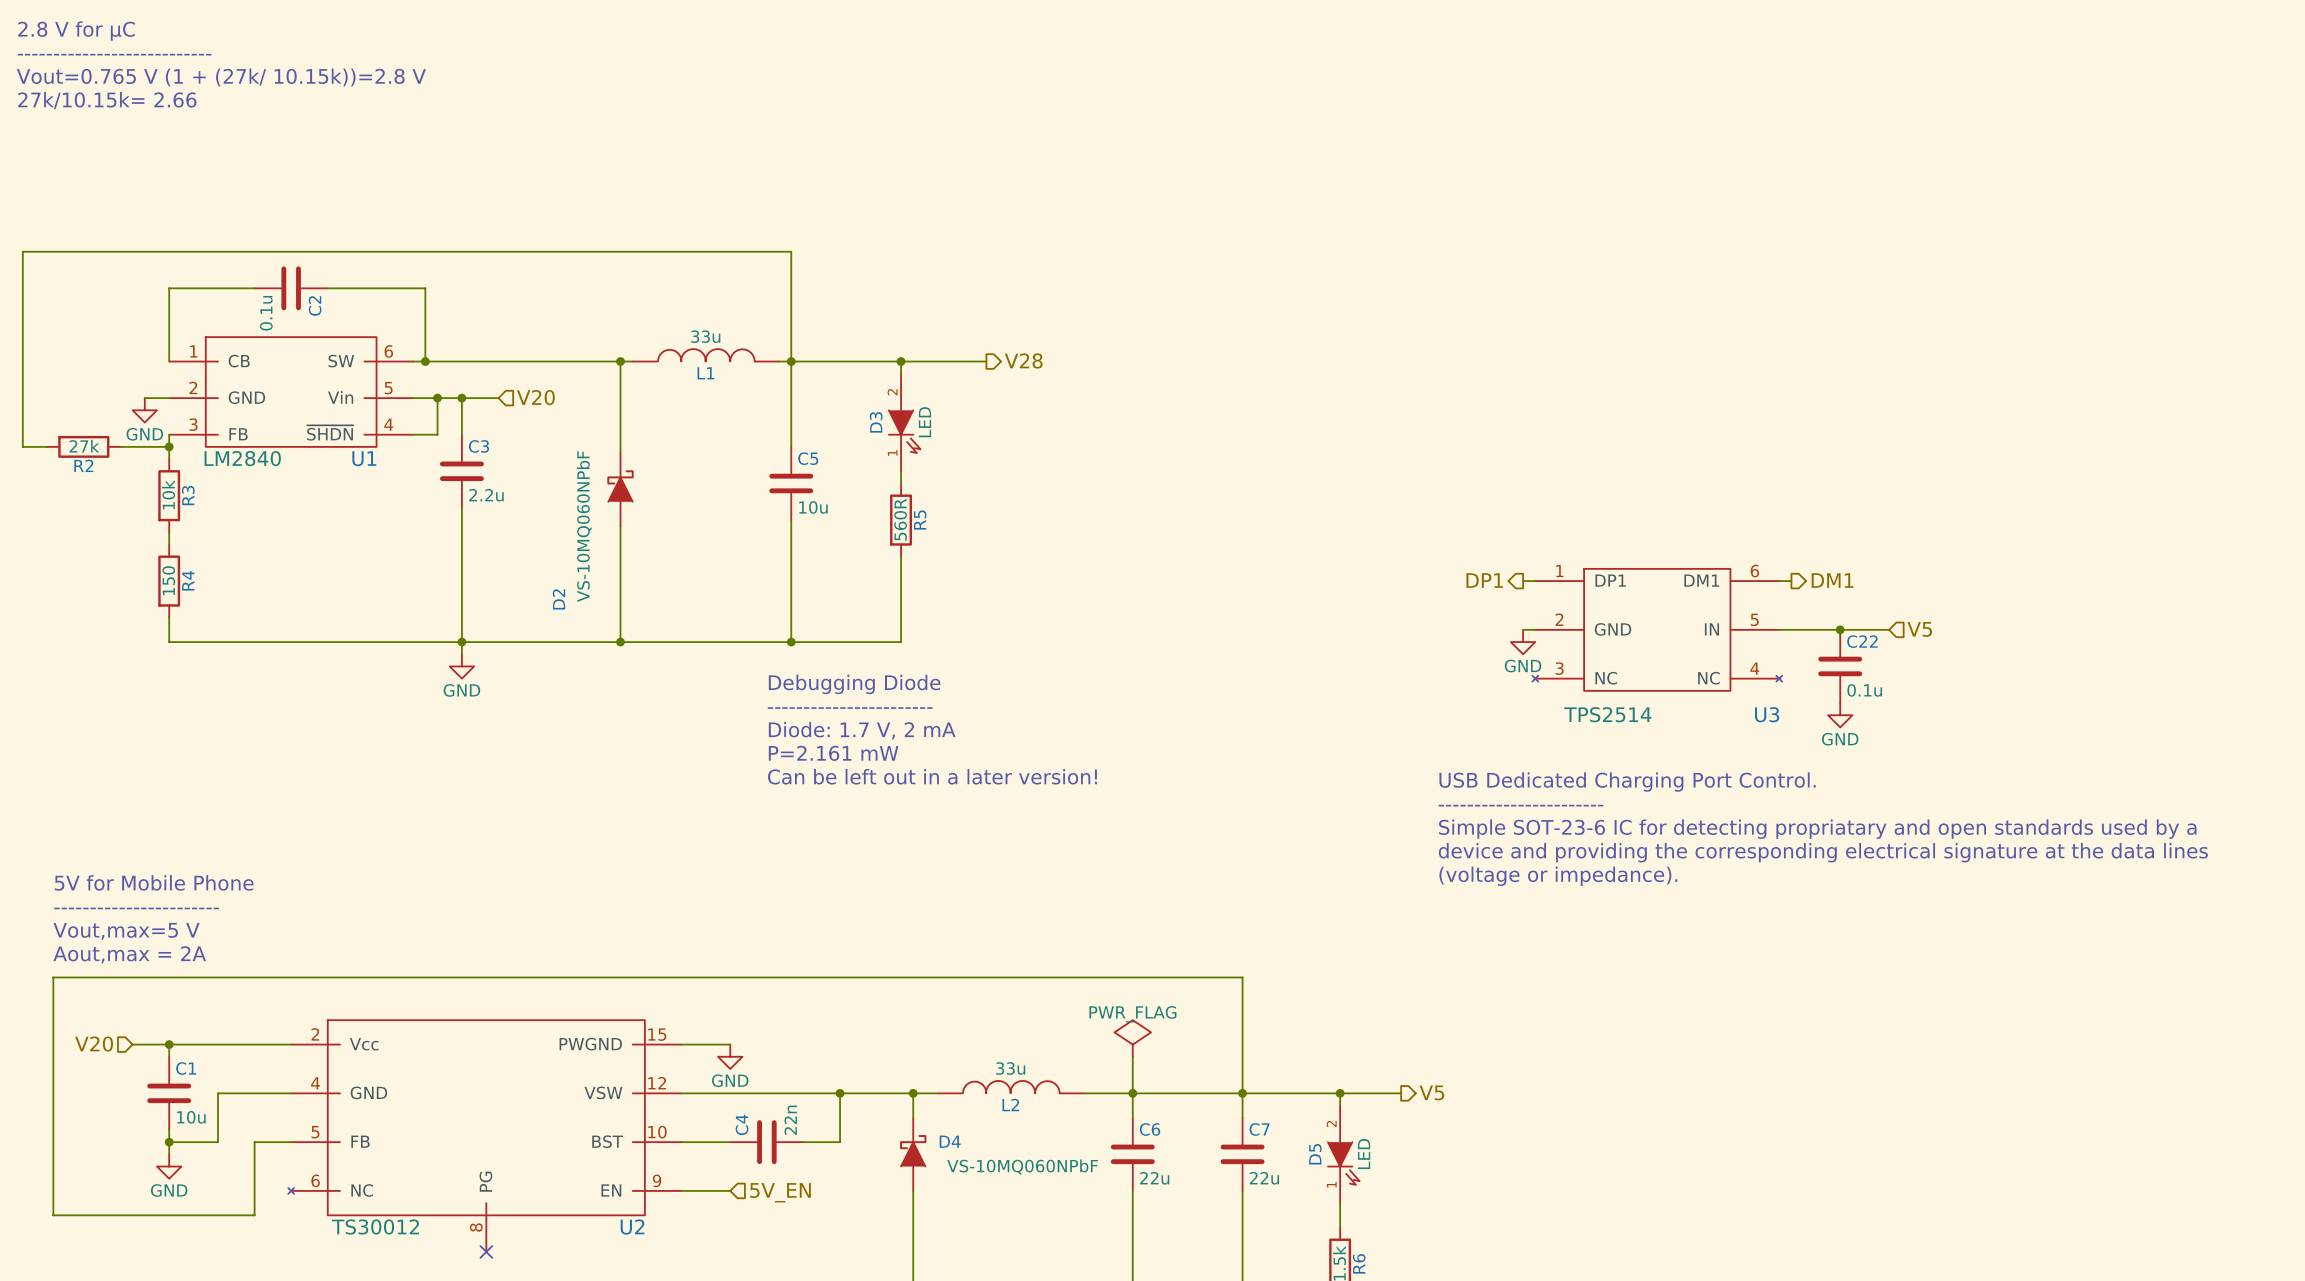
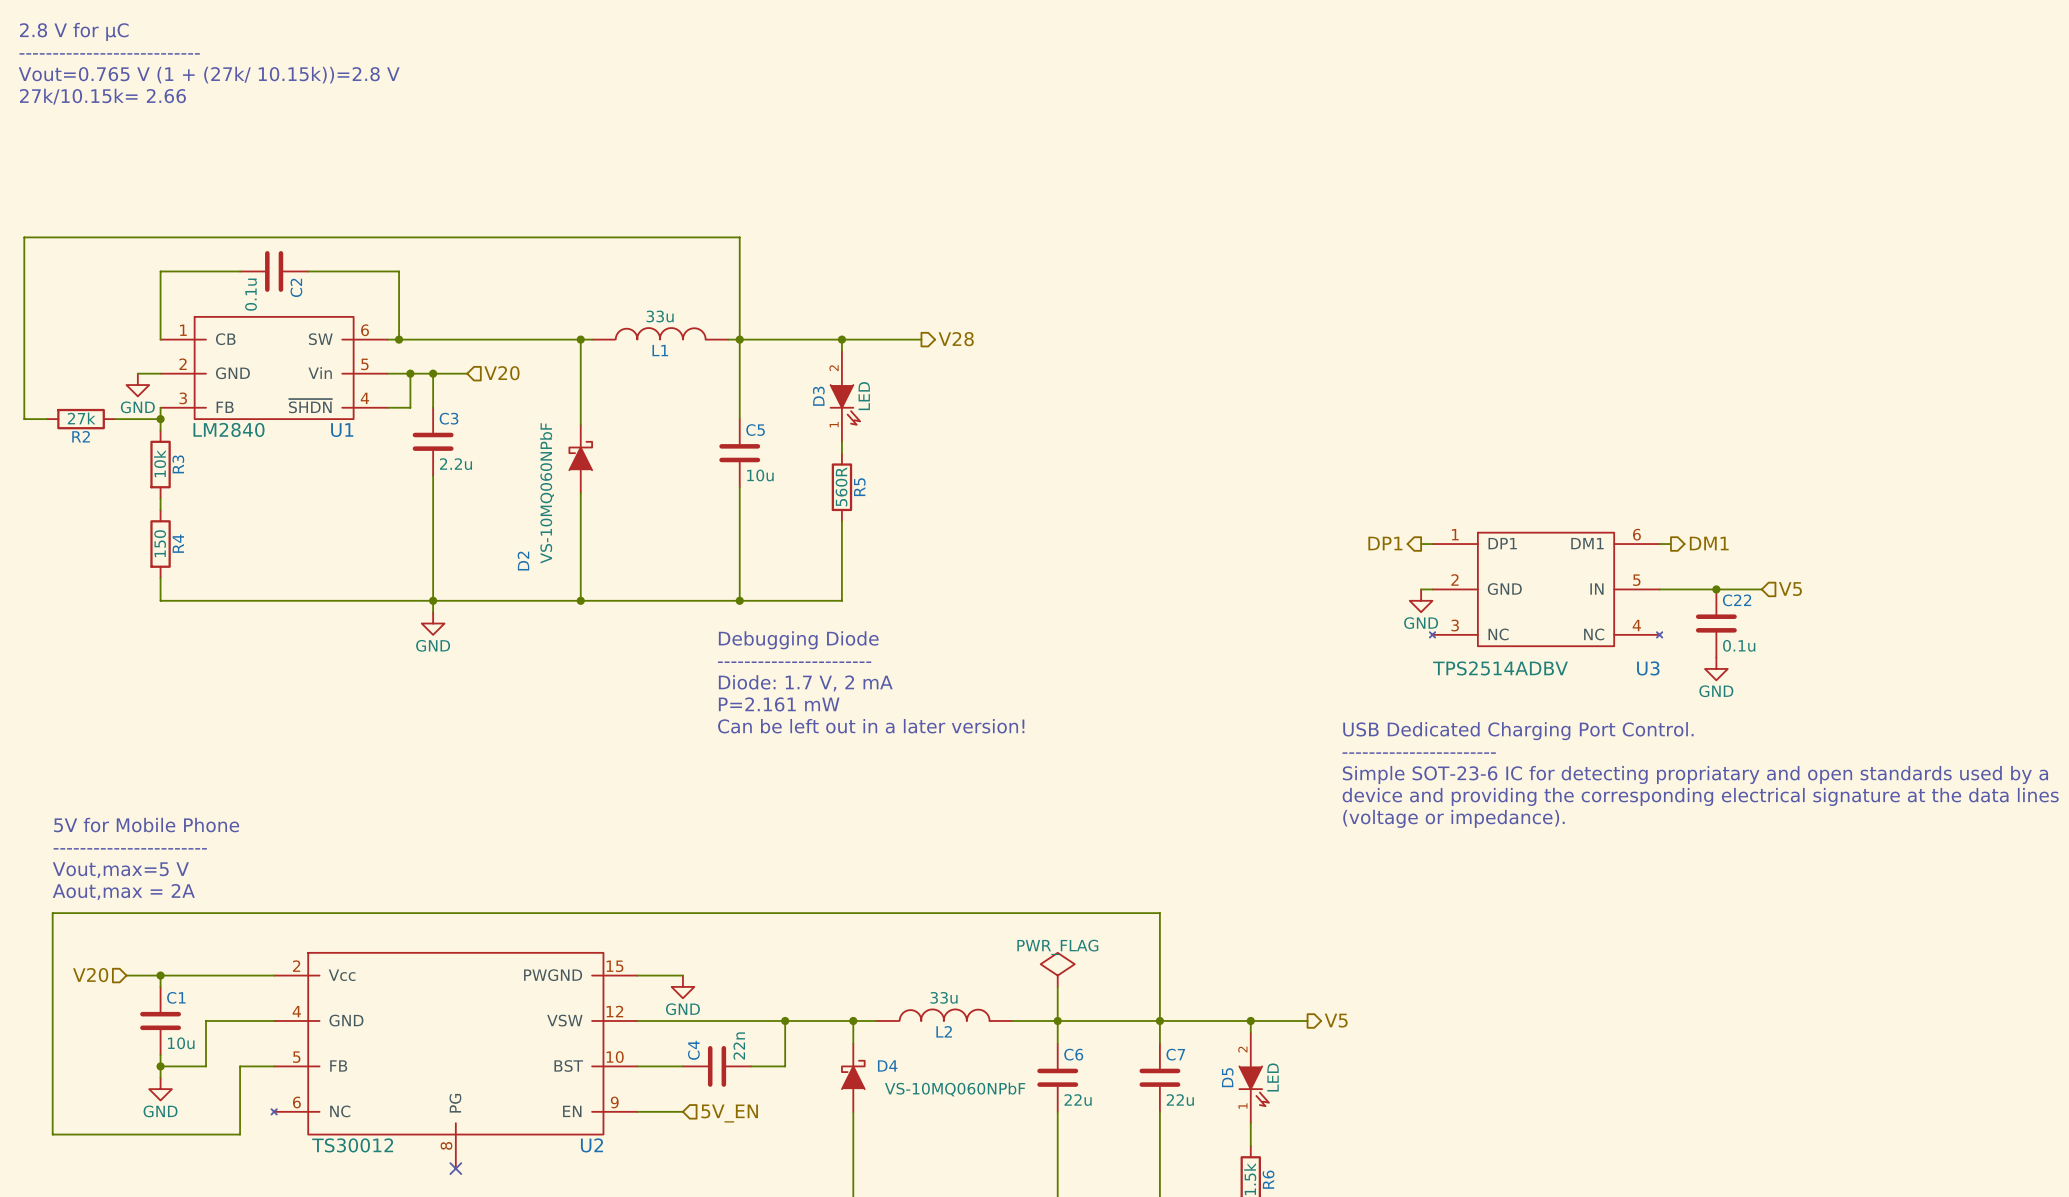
U3 value: TPS2514 (1607, 714) -> TPS2514ADBV (1500, 668)

